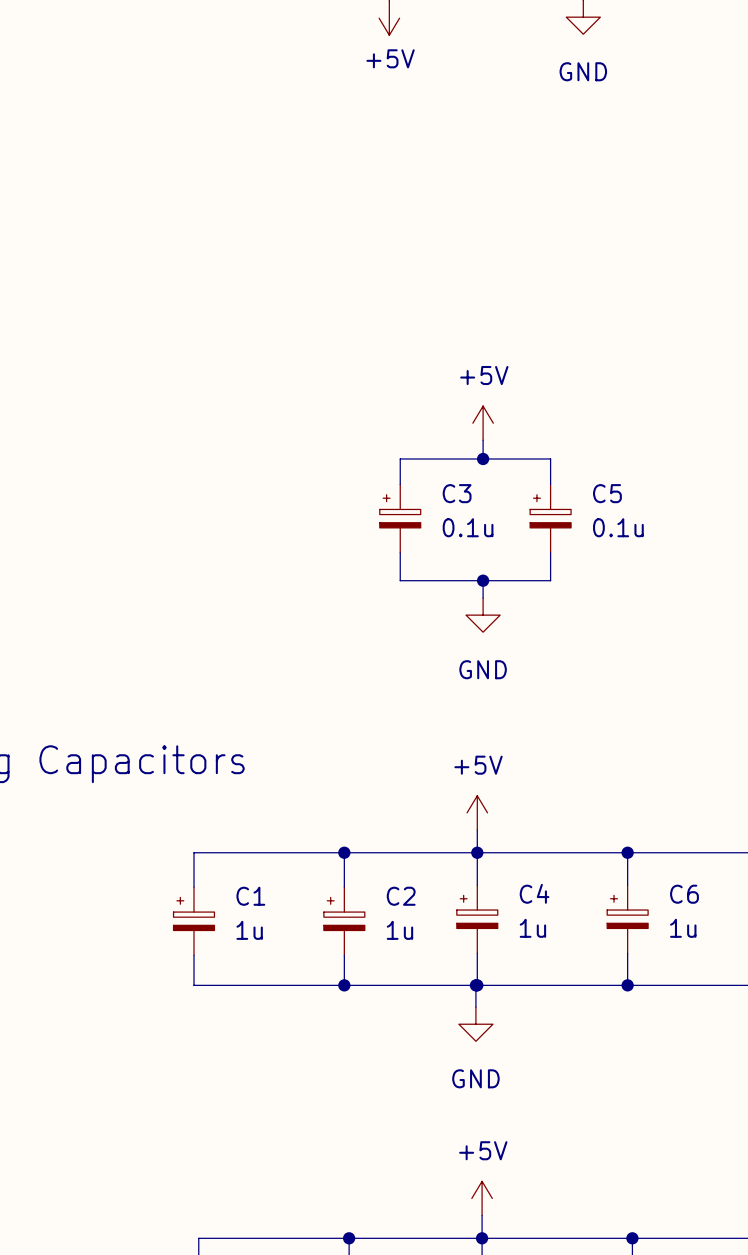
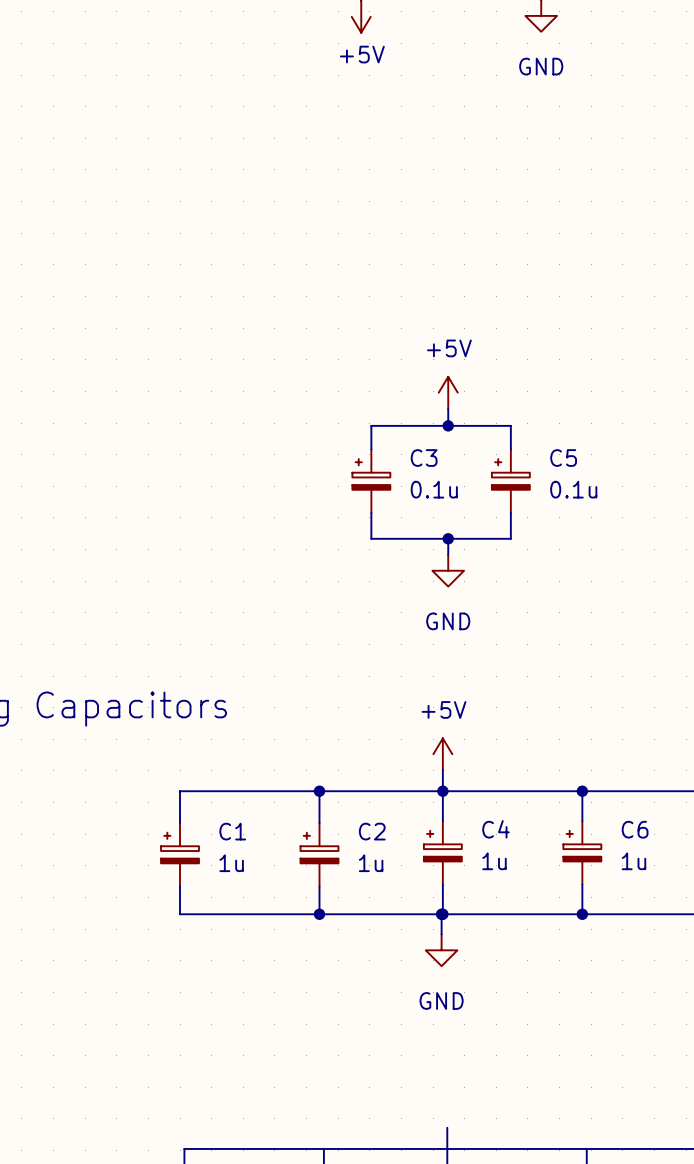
power symbol: +5V (482, 1198) -> none
junction: (349, 1238) -> none
junction: (482, 1238) -> none
junction: (632, 1238) -> none

